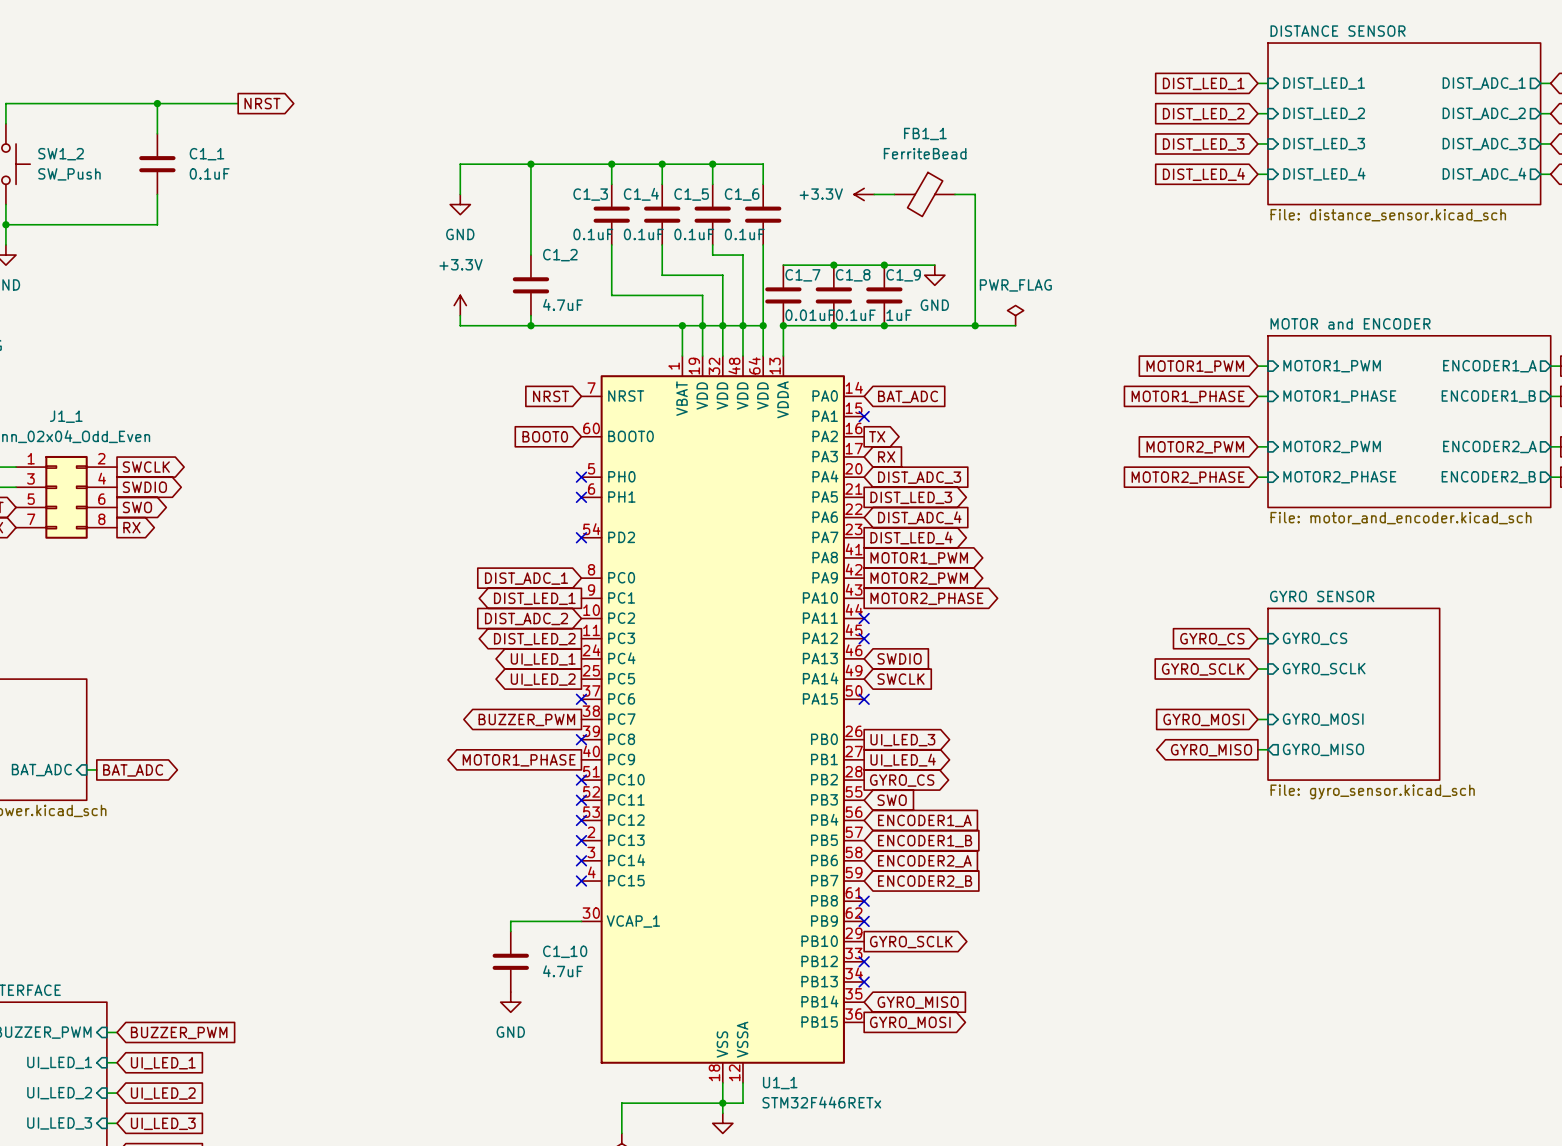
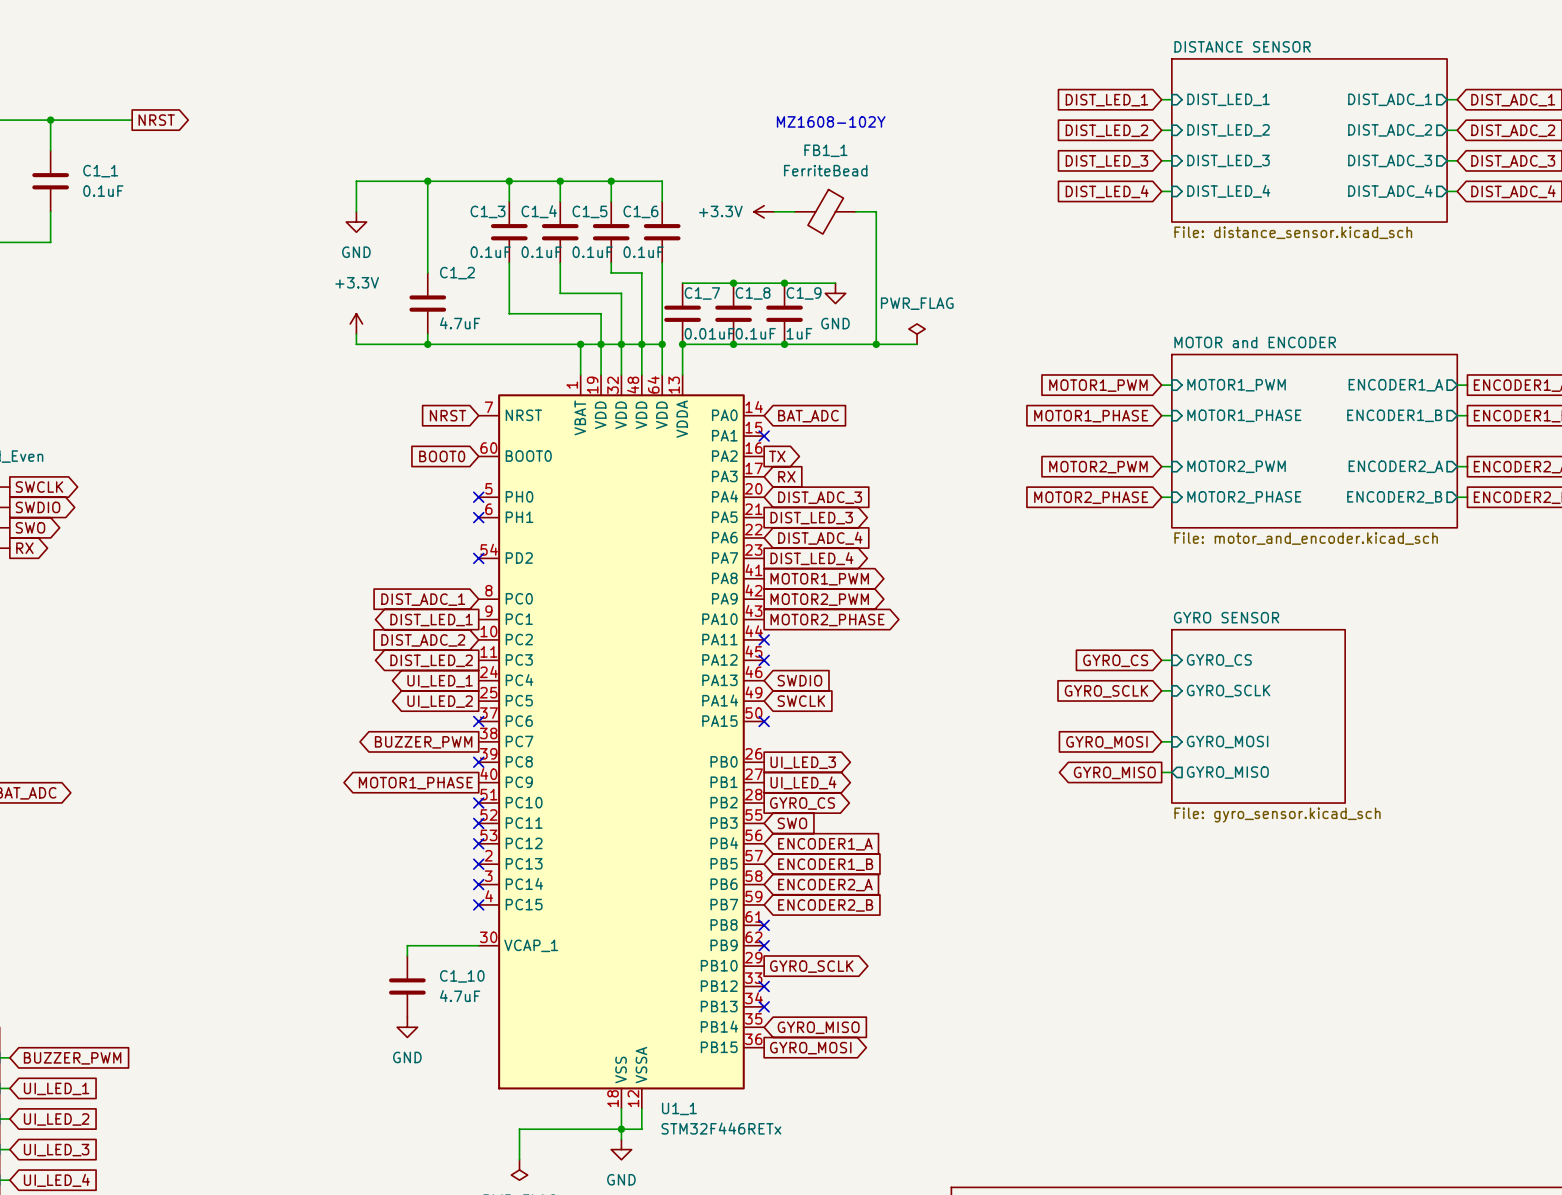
text: none -> MZ1608-102Y (831, 121)

